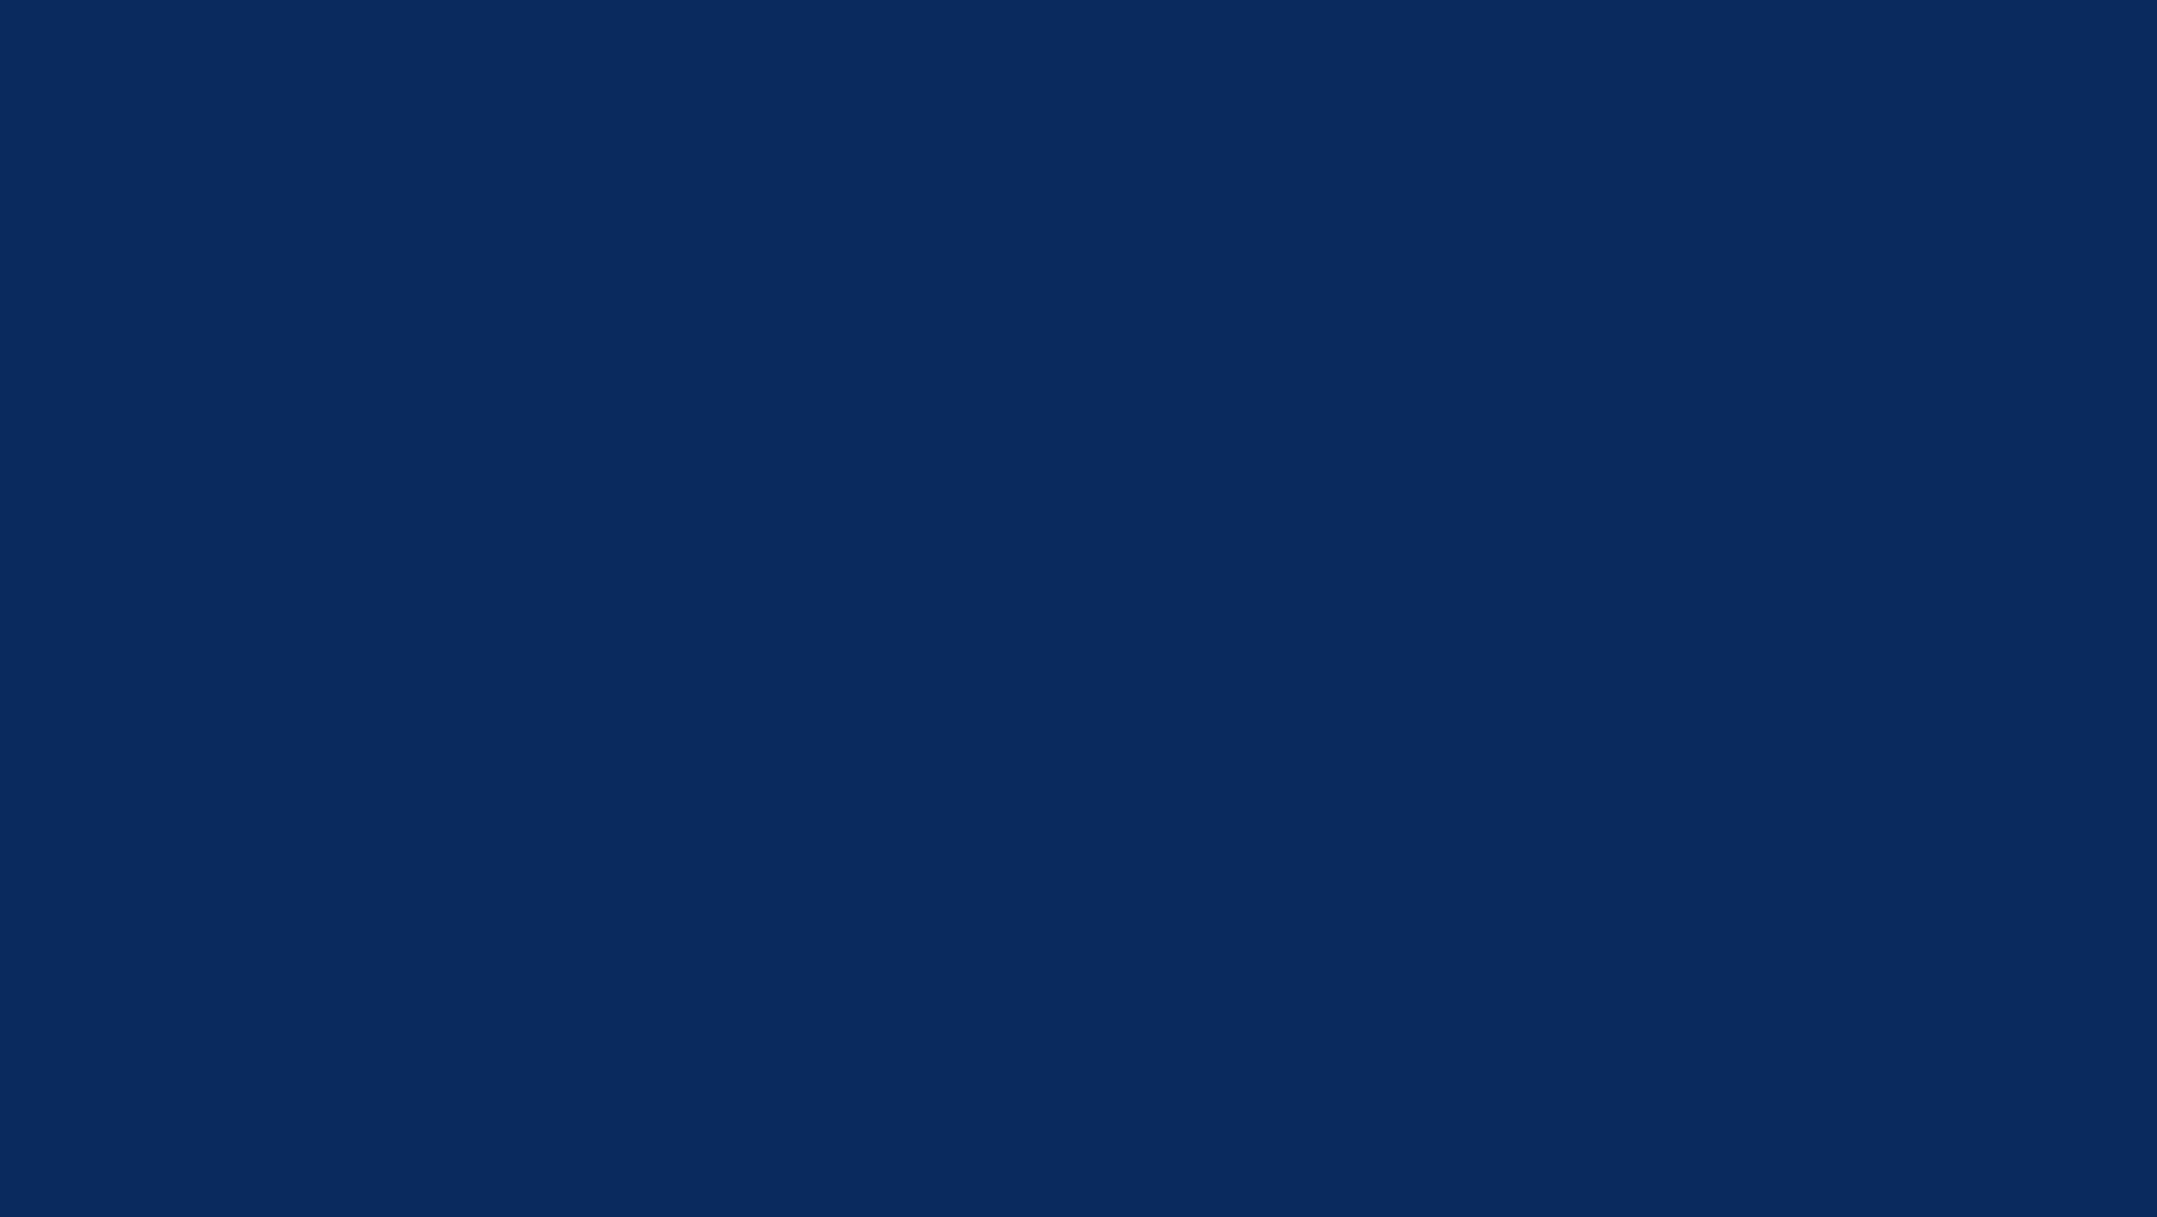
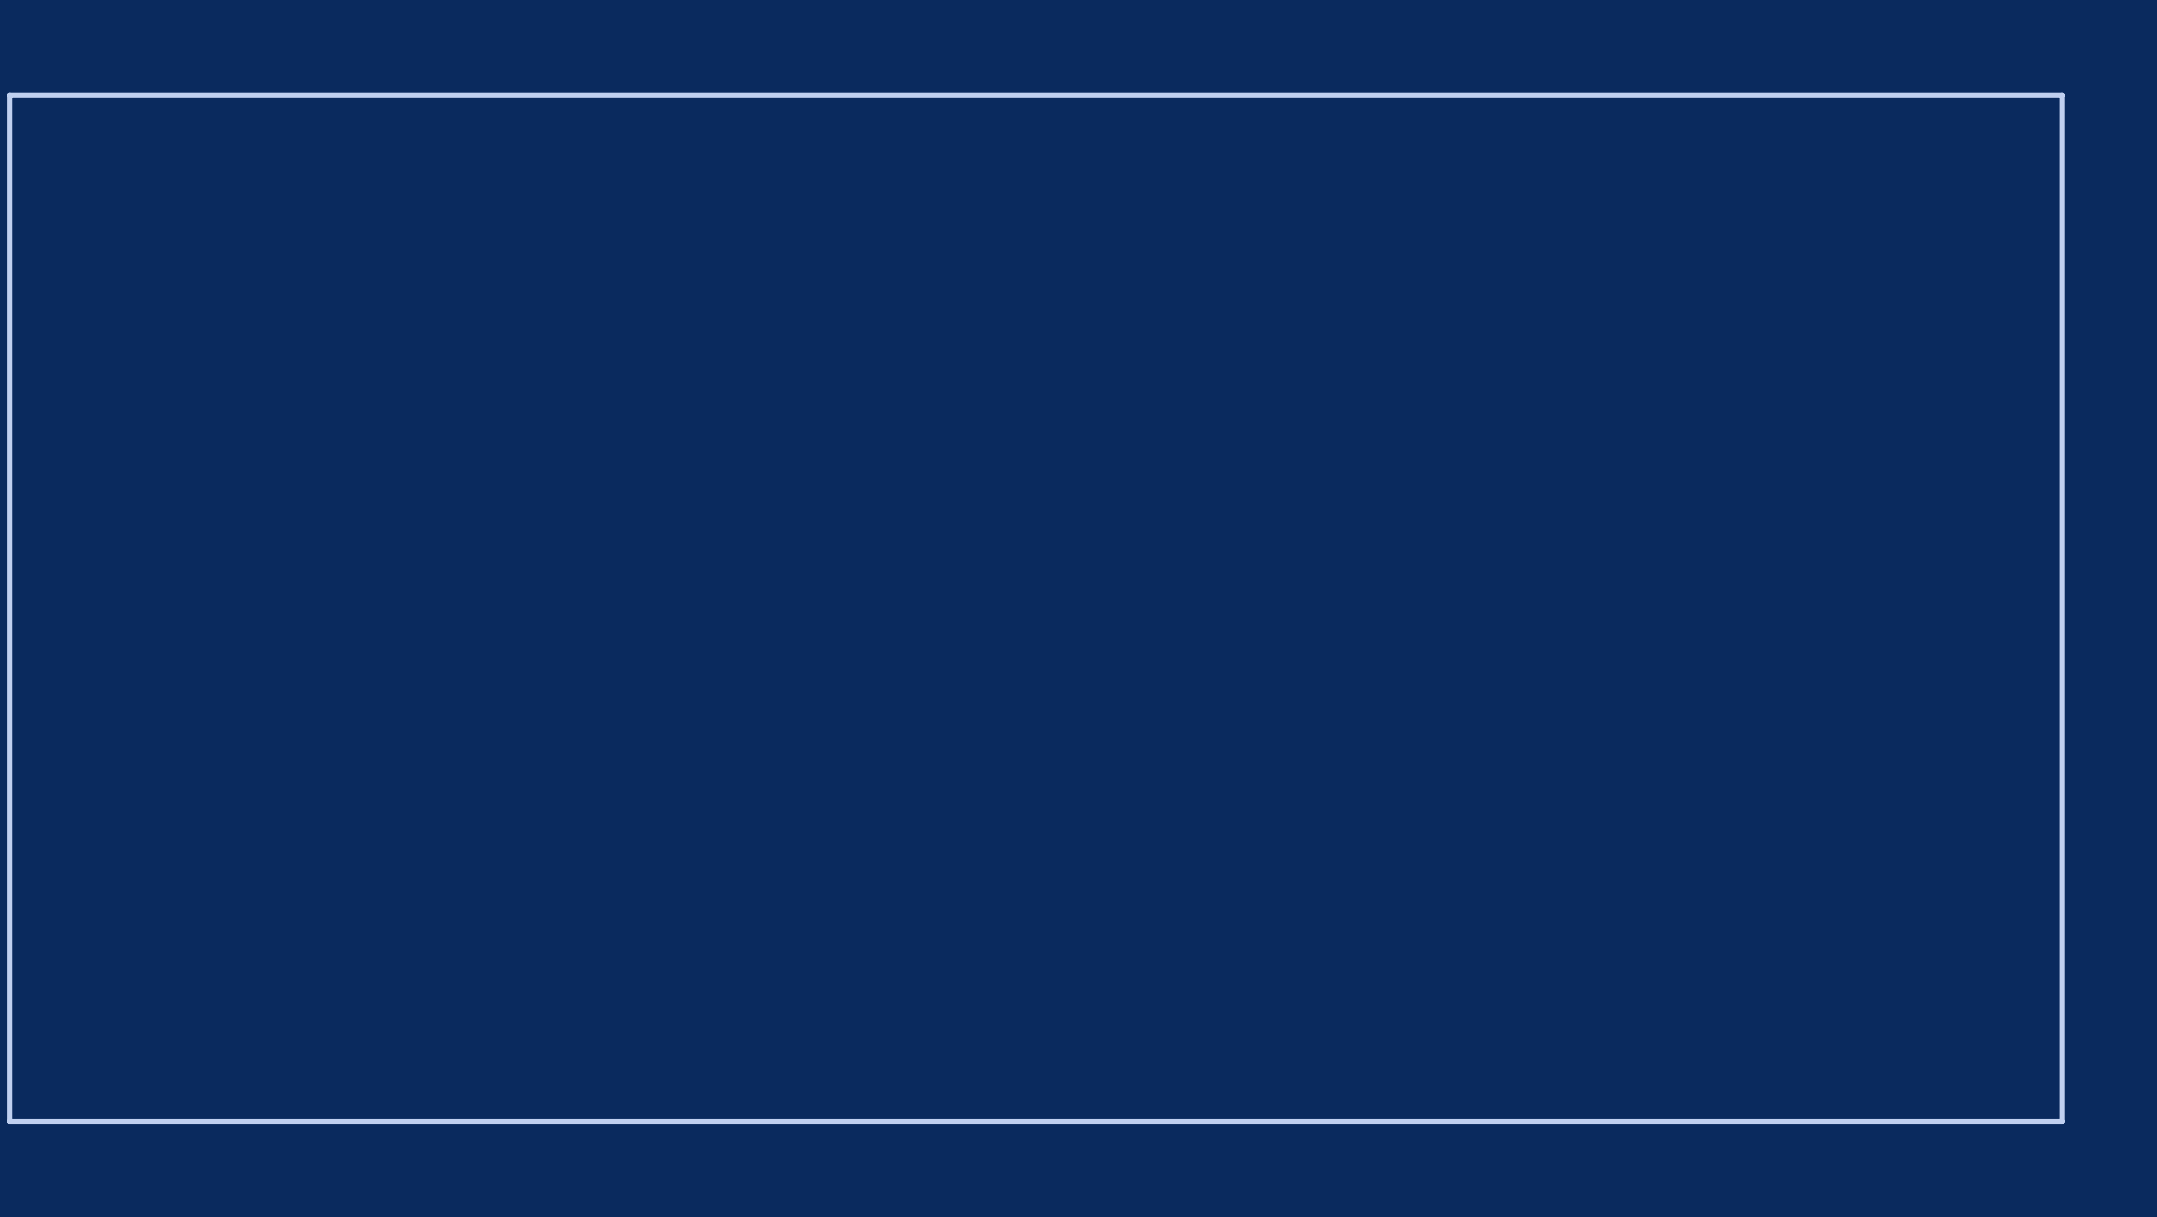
board edge: none -> (2062, 95) (9, 95) (9, 1121) (2062, 1121) (2062, 95)

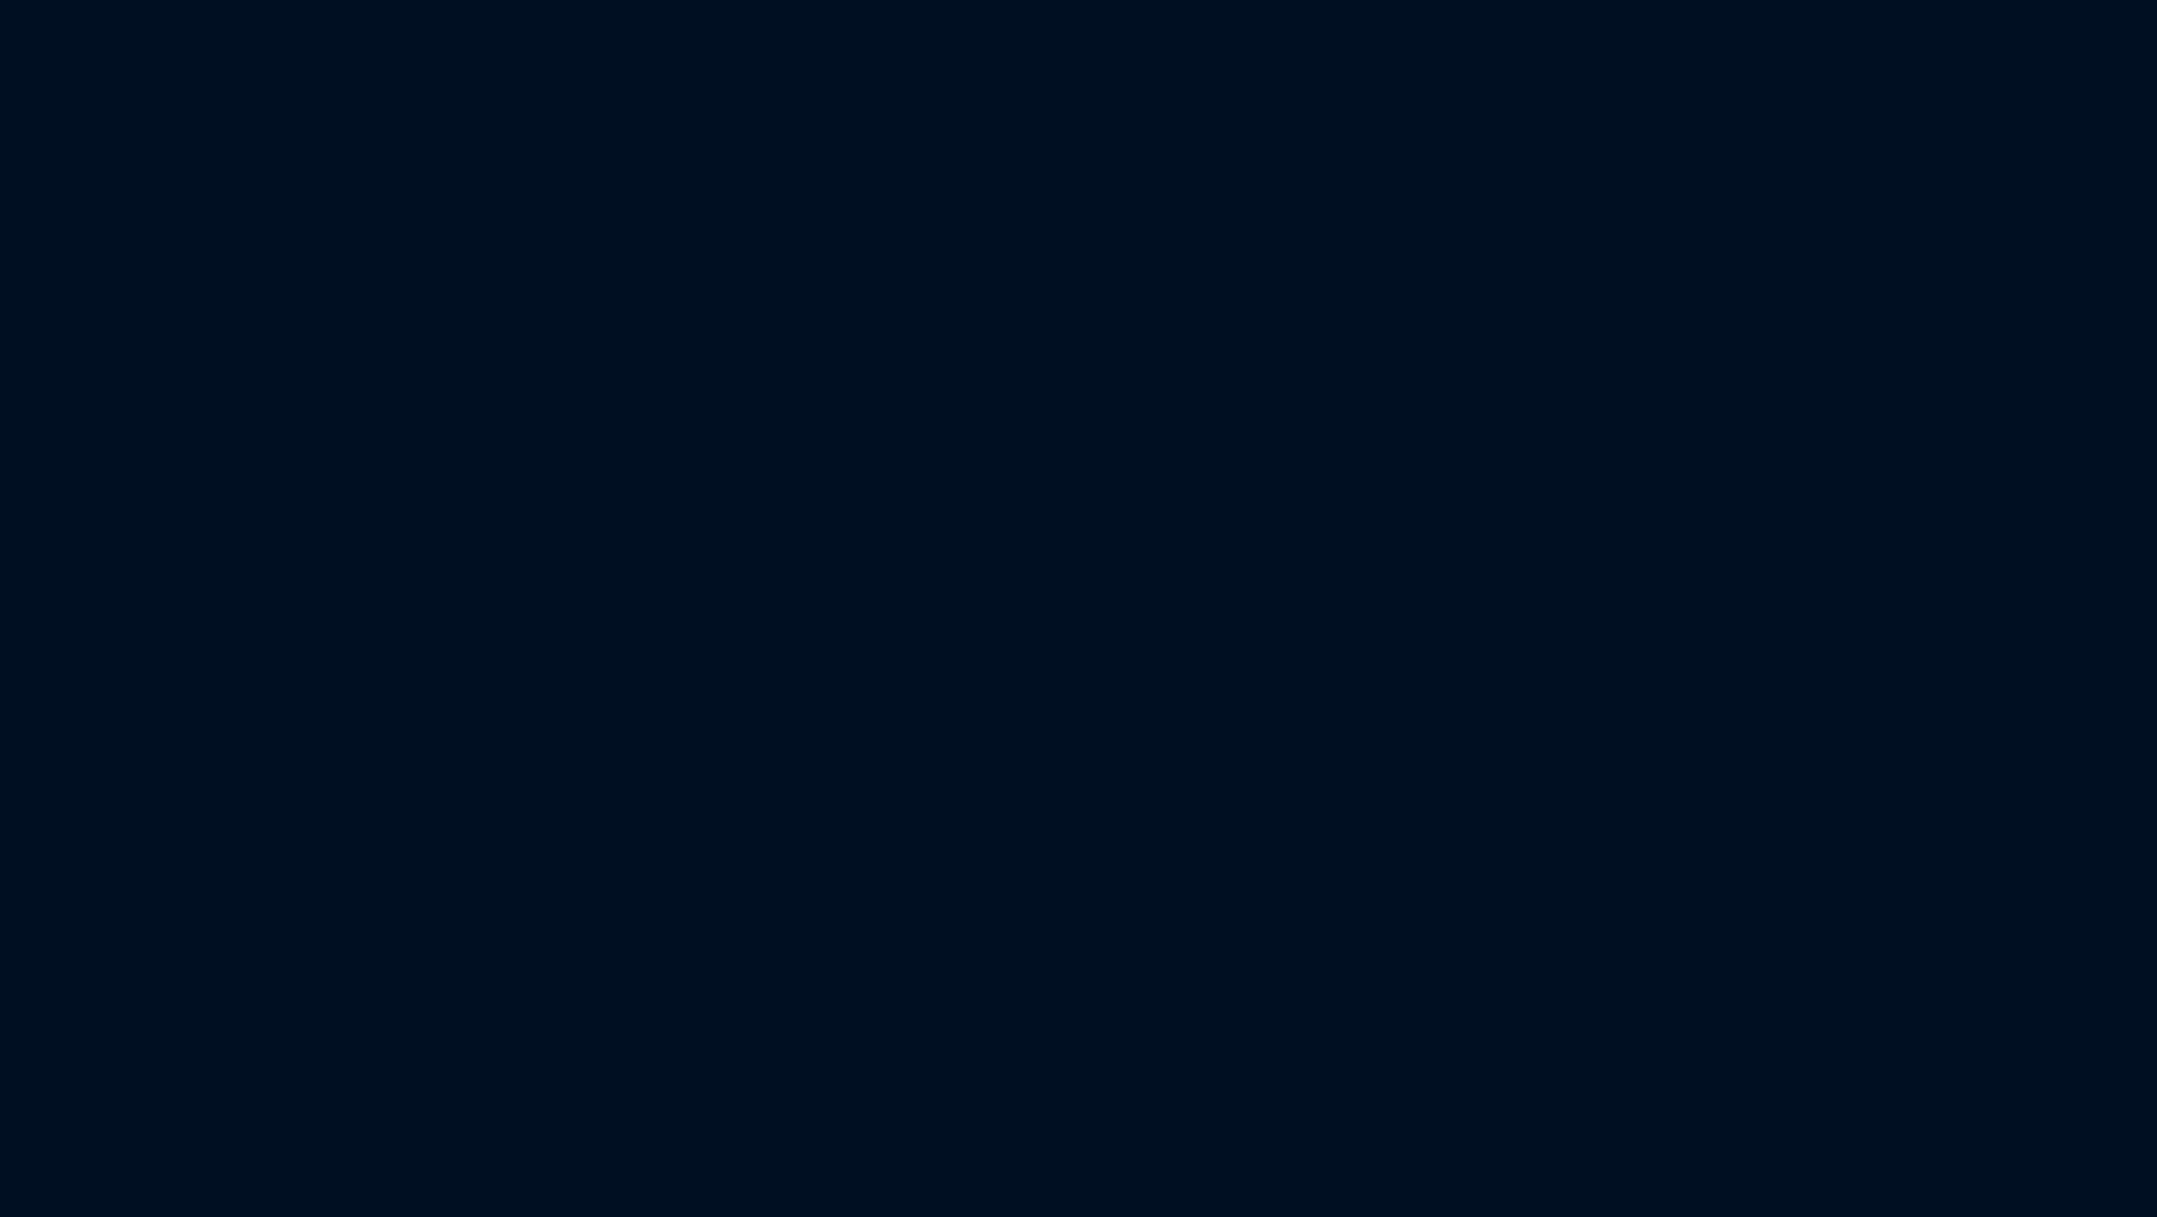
board edge: (2062, 95) (9, 95) (9, 1121) (2062, 1121) (2062, 95) -> none

